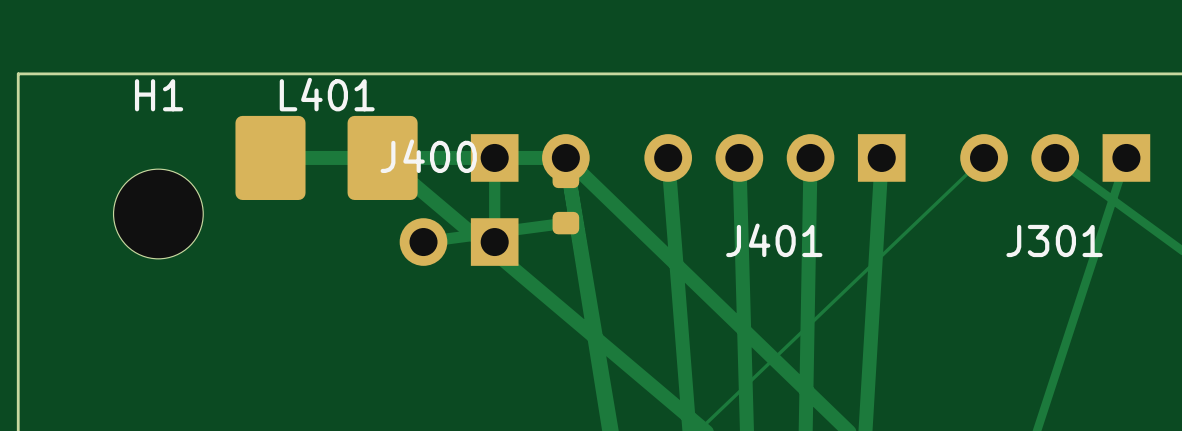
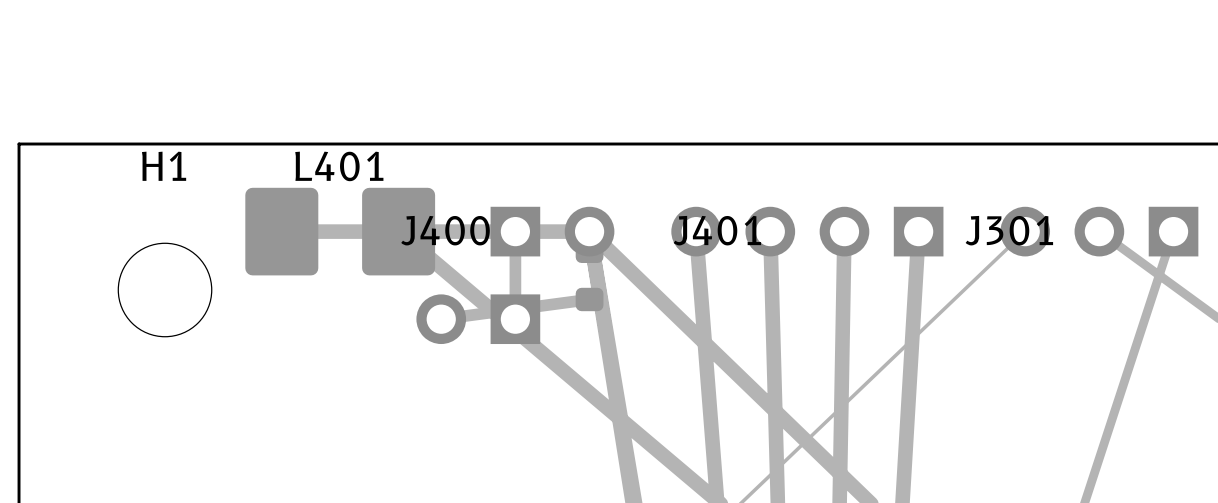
J401 name position: J401 (774, 240) -> J401 (717, 230)
J301 name position: J301 (1054, 240) -> J301 (1009, 230)

